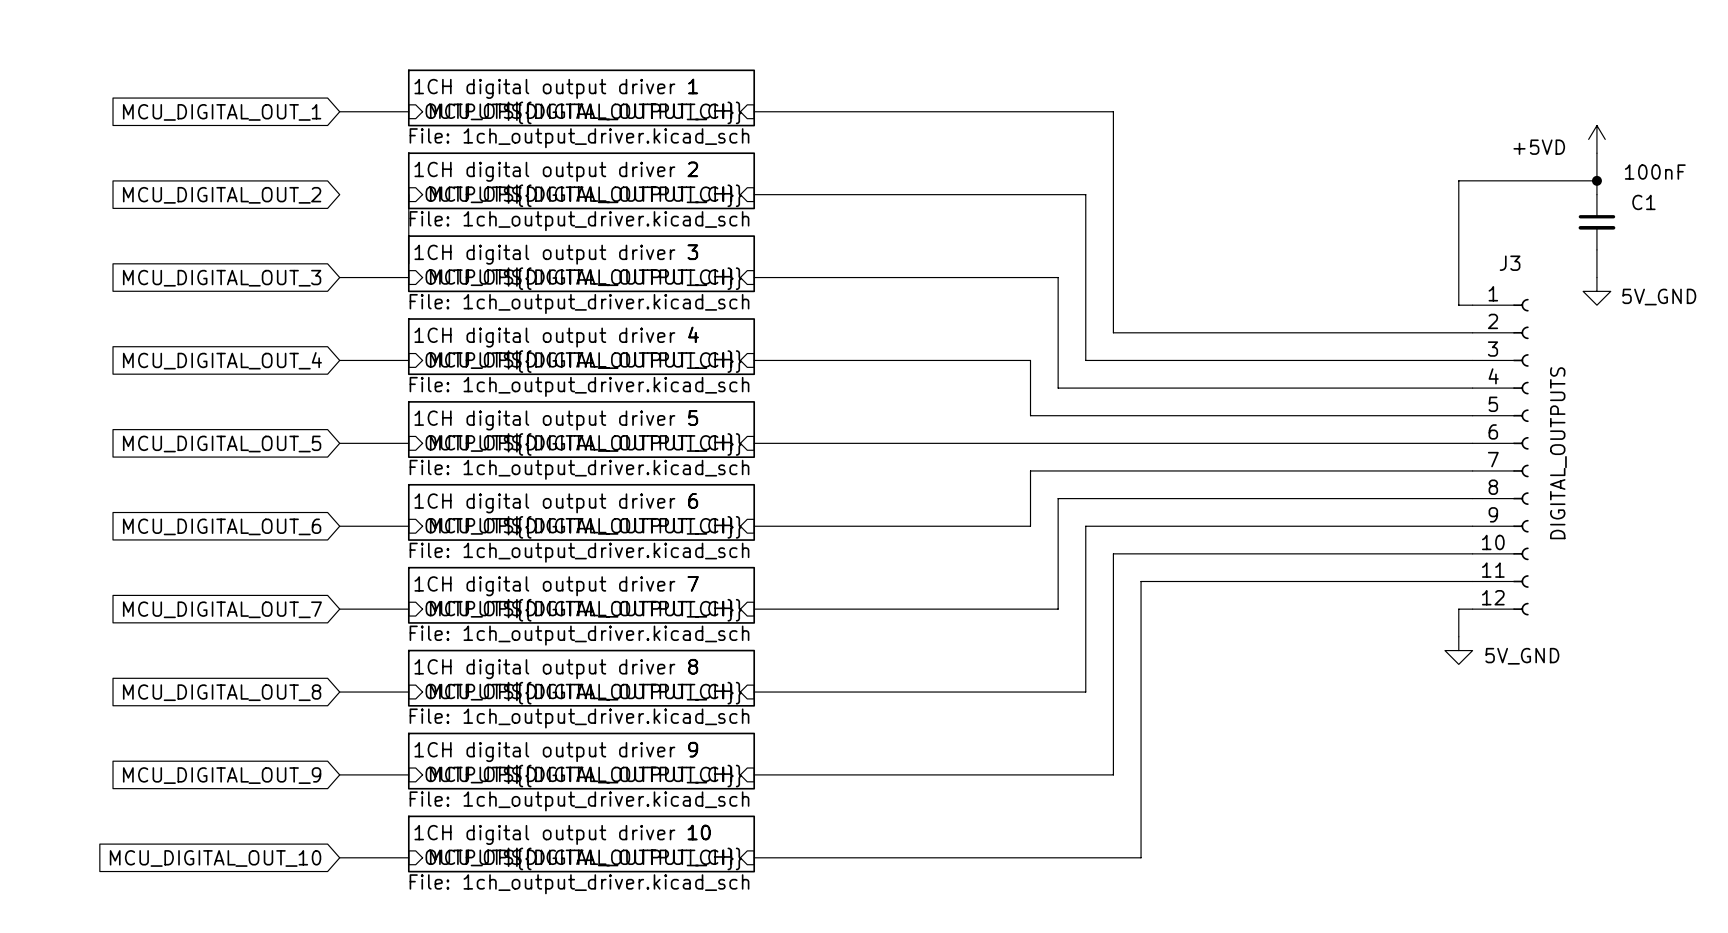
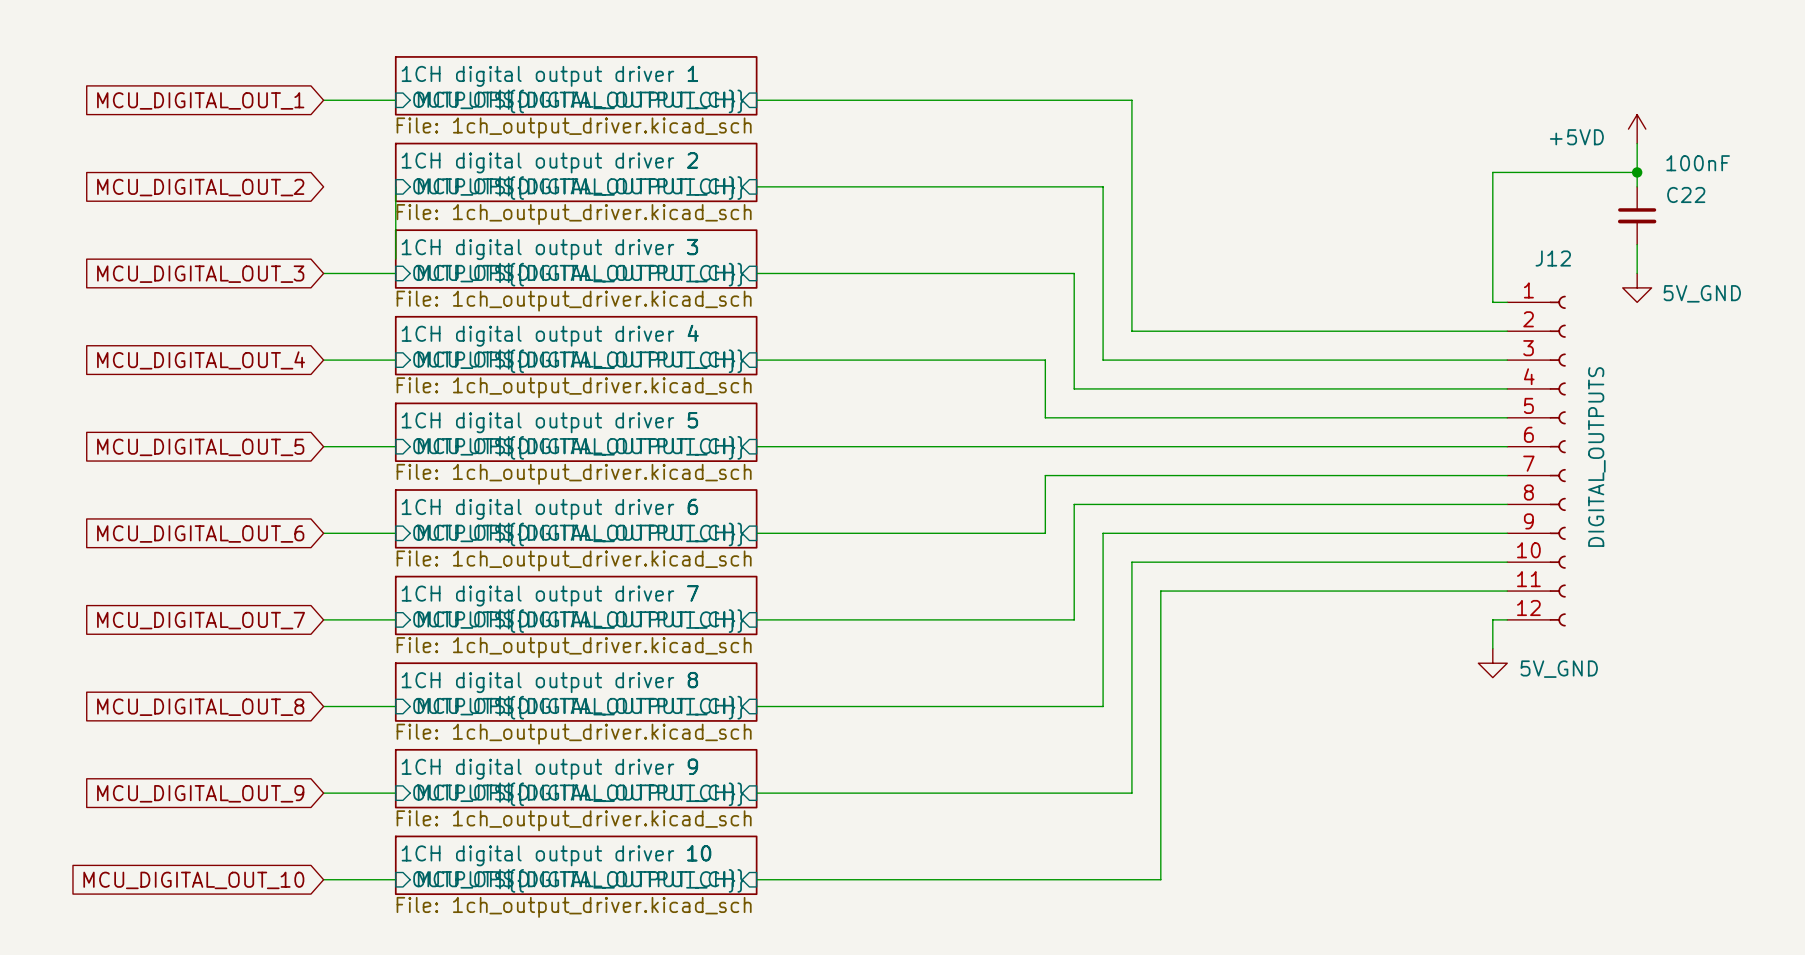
C1 name: C1 (1643, 202) -> C22 (1686, 194)
J3 name: J3 (1510, 263) -> J12 (1553, 258)

